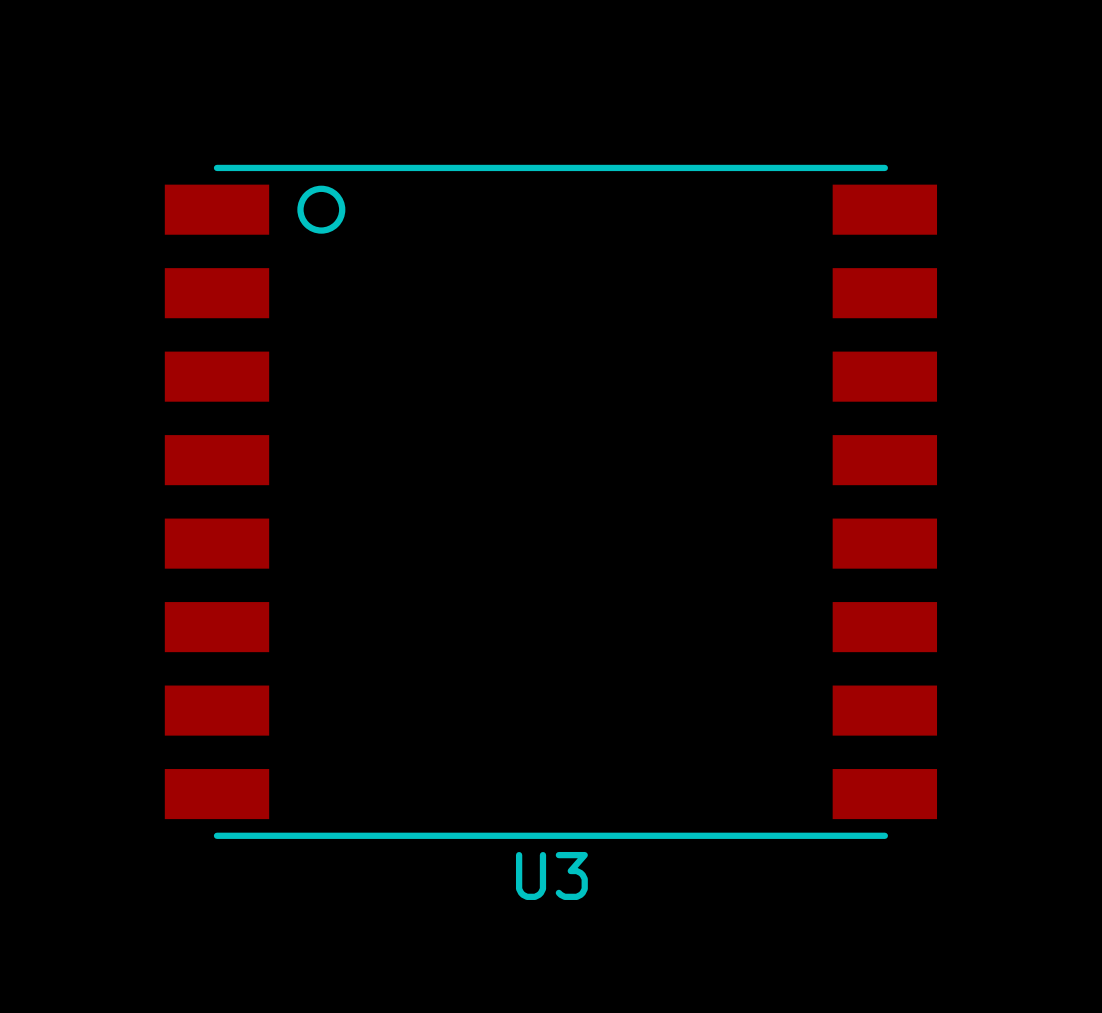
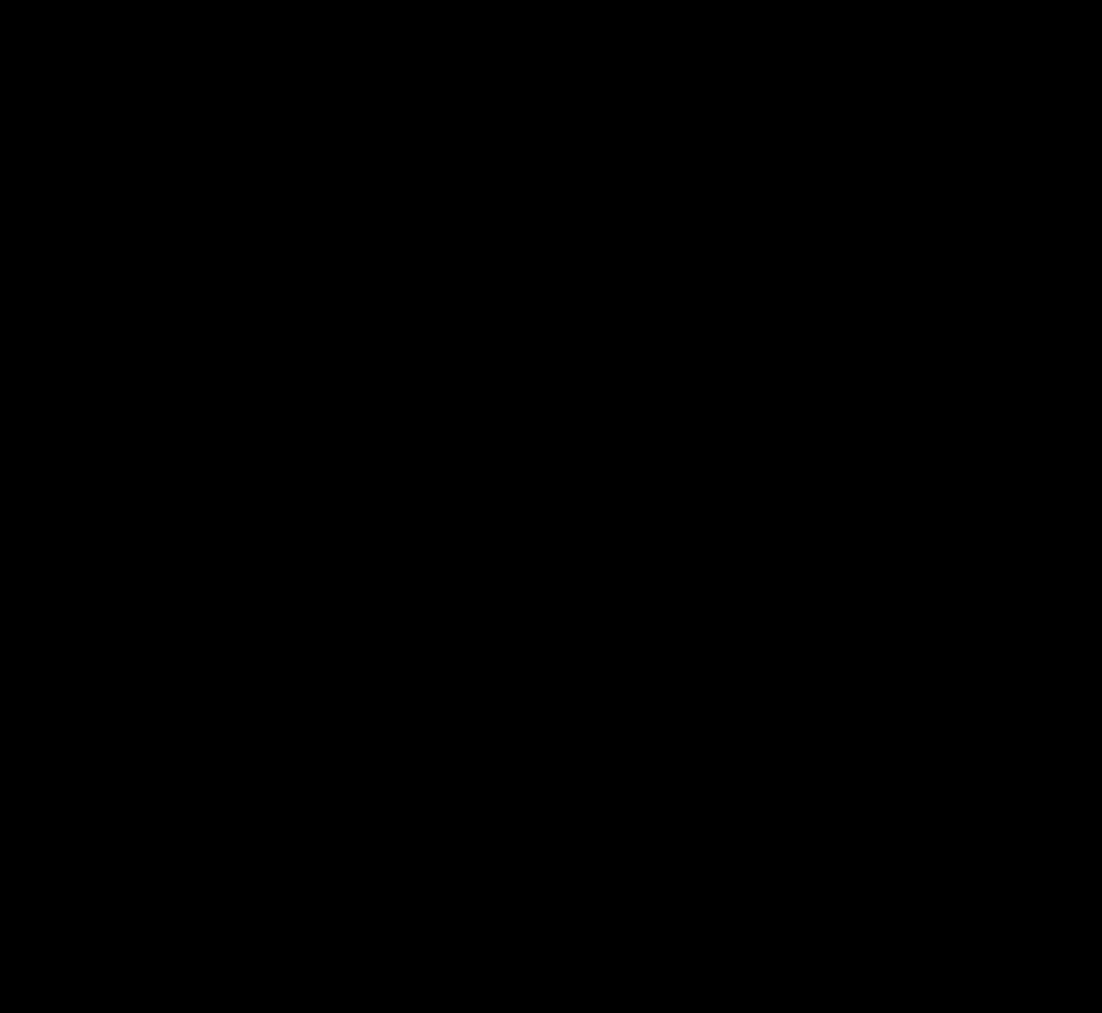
U3: (550, 501) -> none

